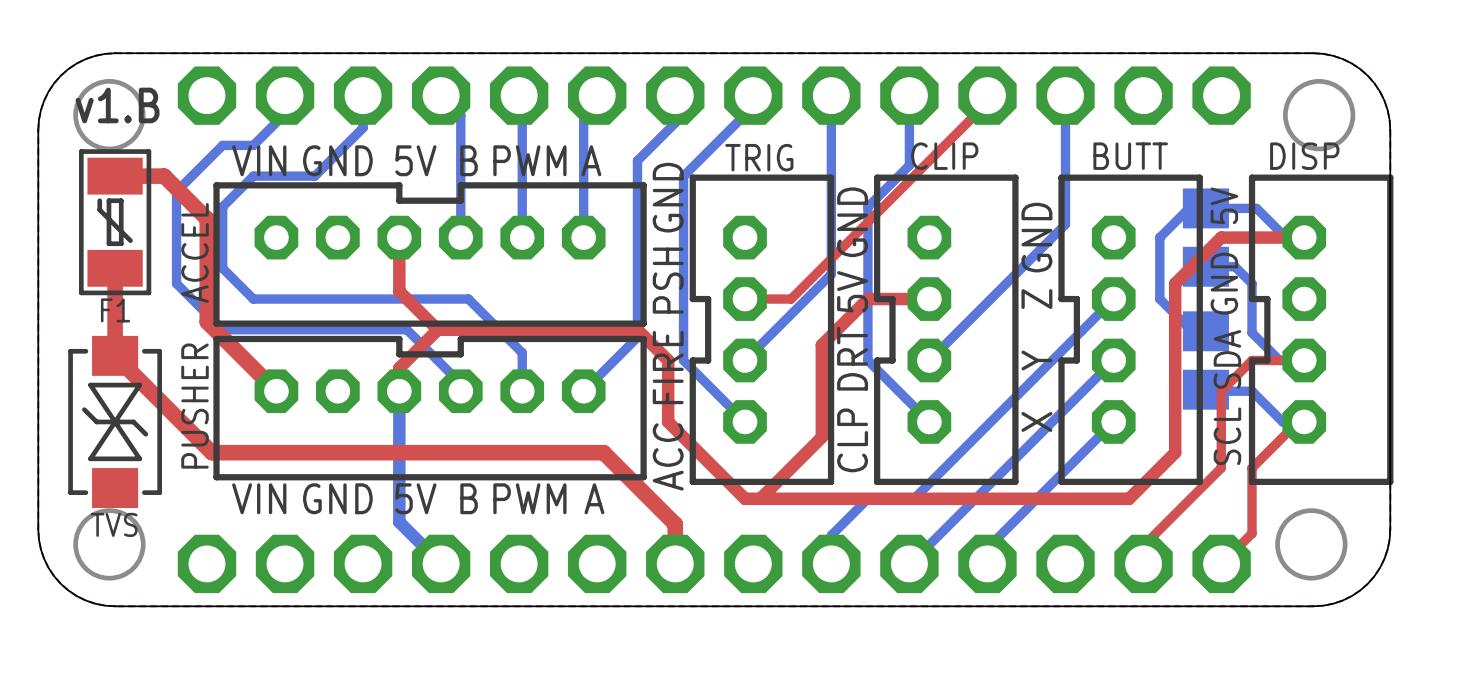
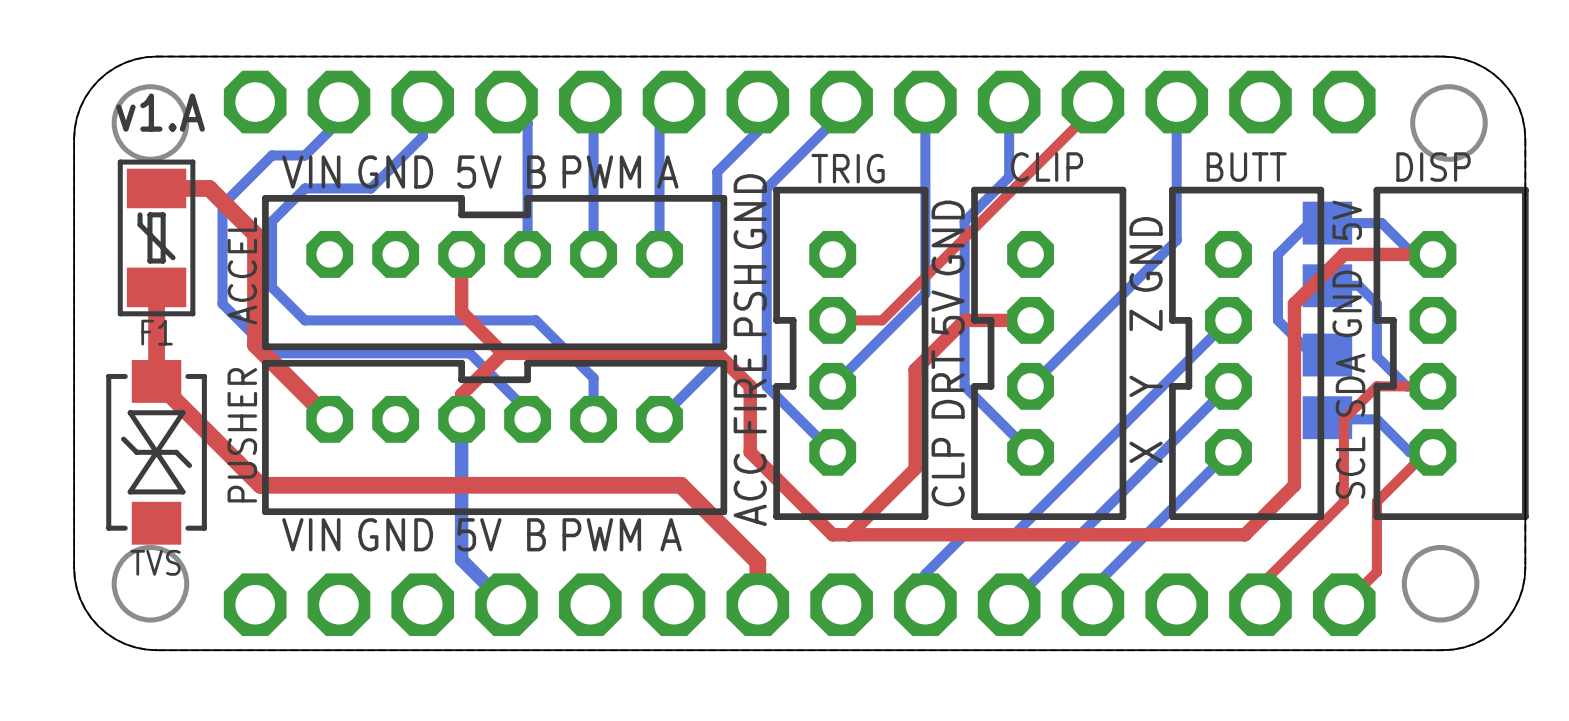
text: v1.B (117, 105) -> v1.A (160, 112)

